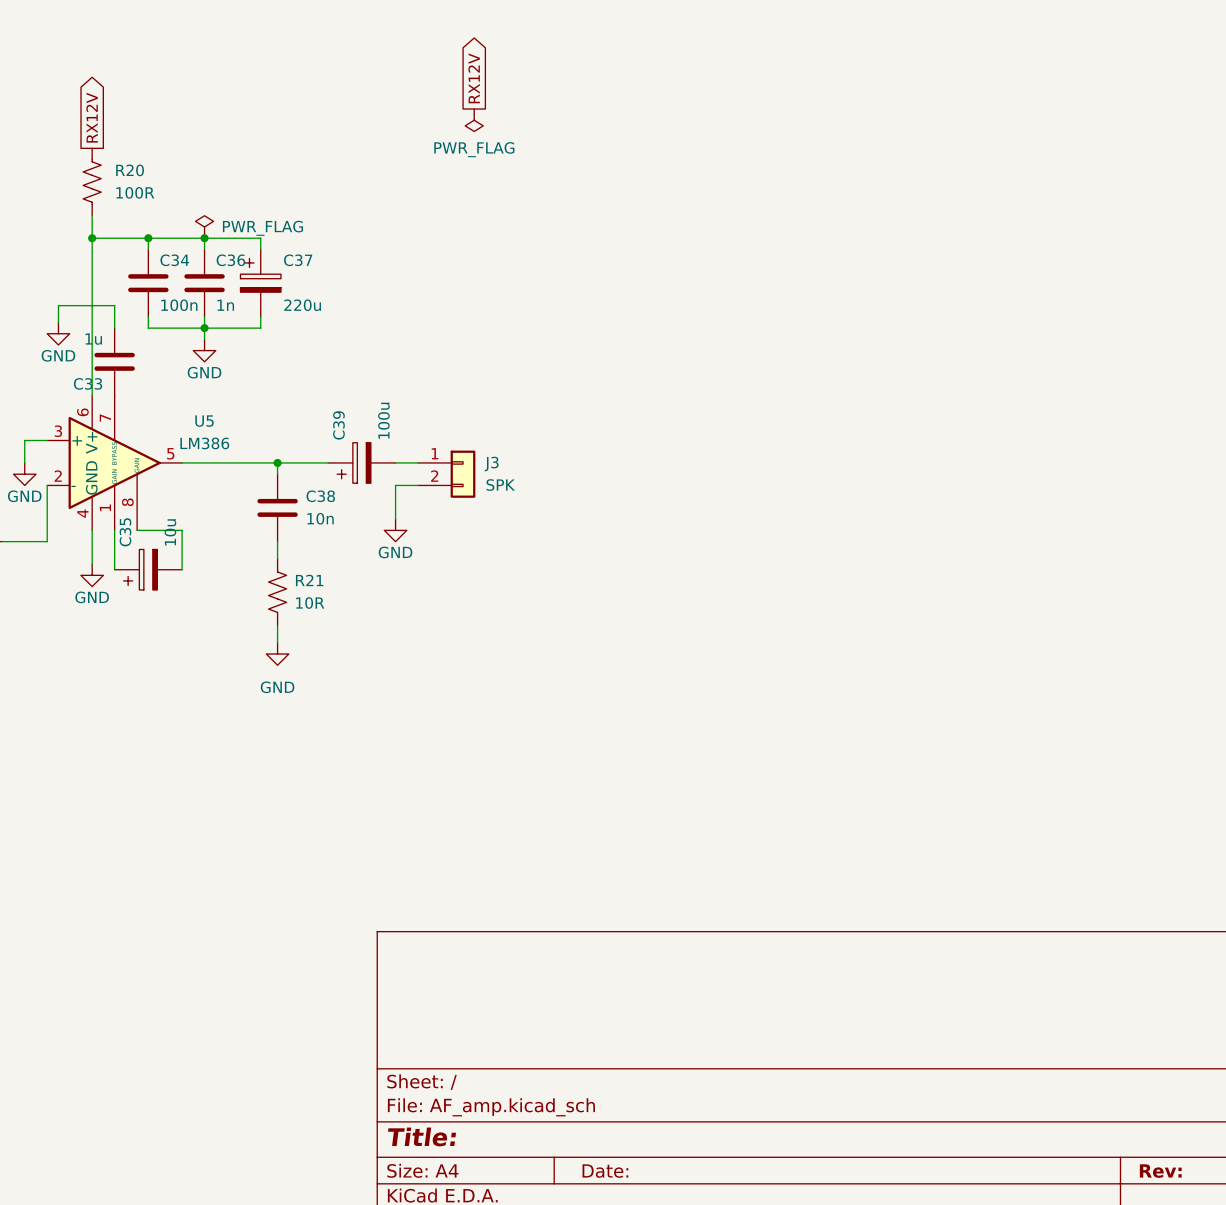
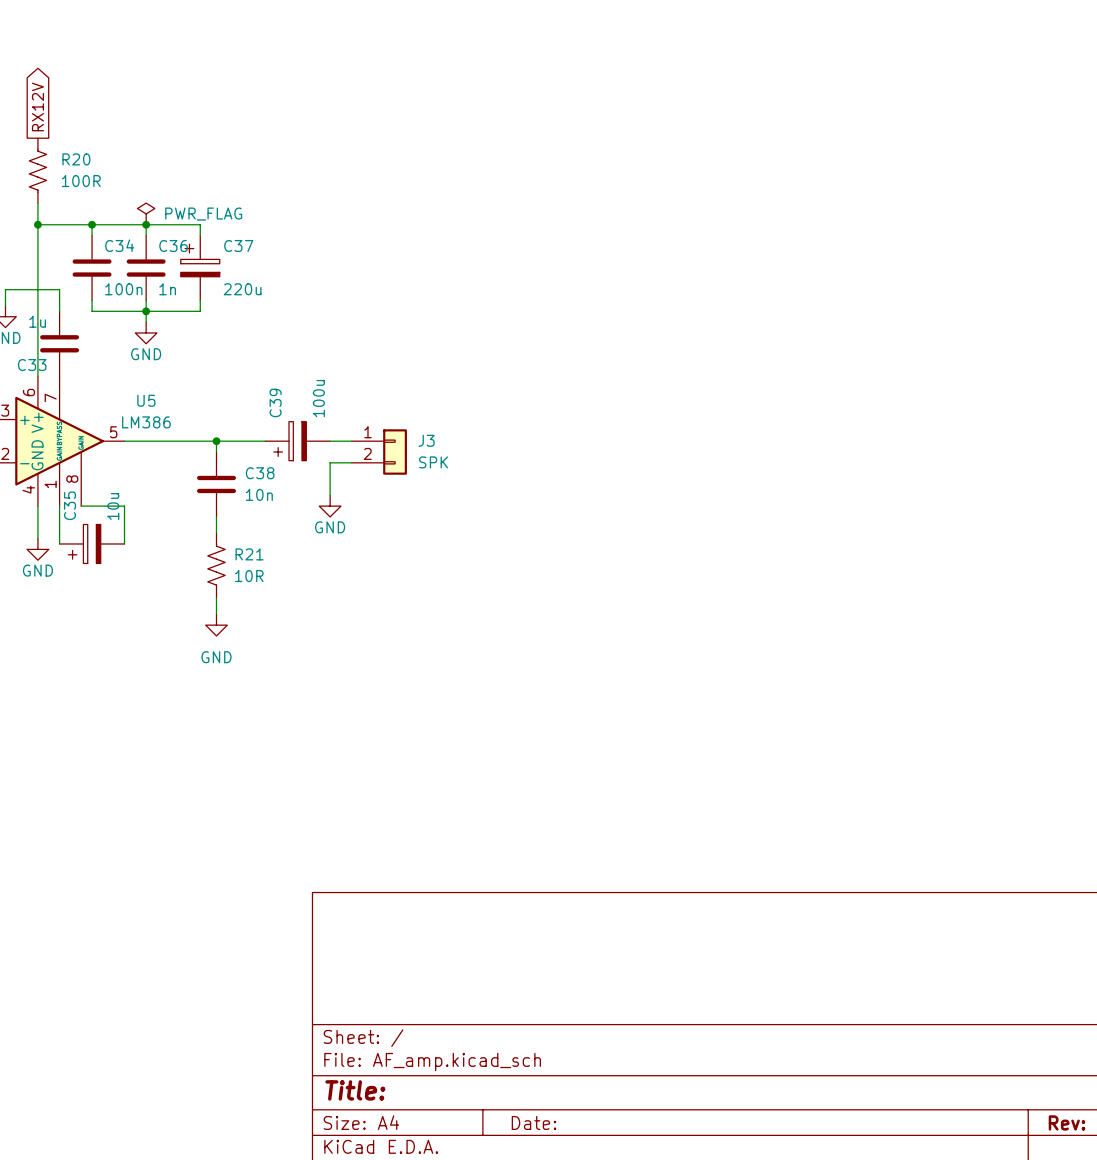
global label: RX12V (474, 78) -> none
power symbol: PWR_FLAG (474, 120) -> none

